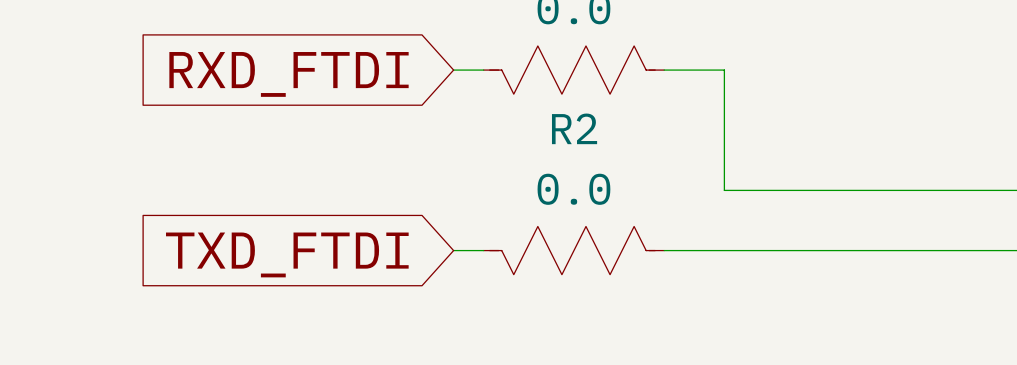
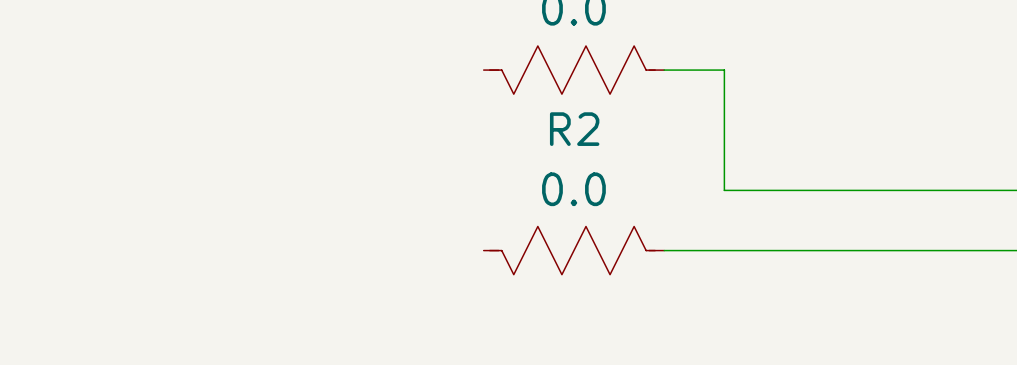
wire: (453, 70) (483, 70) -> none
global label: RXD_FTDI (289, 74) -> none
wire: (453, 250) (483, 250) -> none
global label: TXD_FTDI (287, 254) -> none

